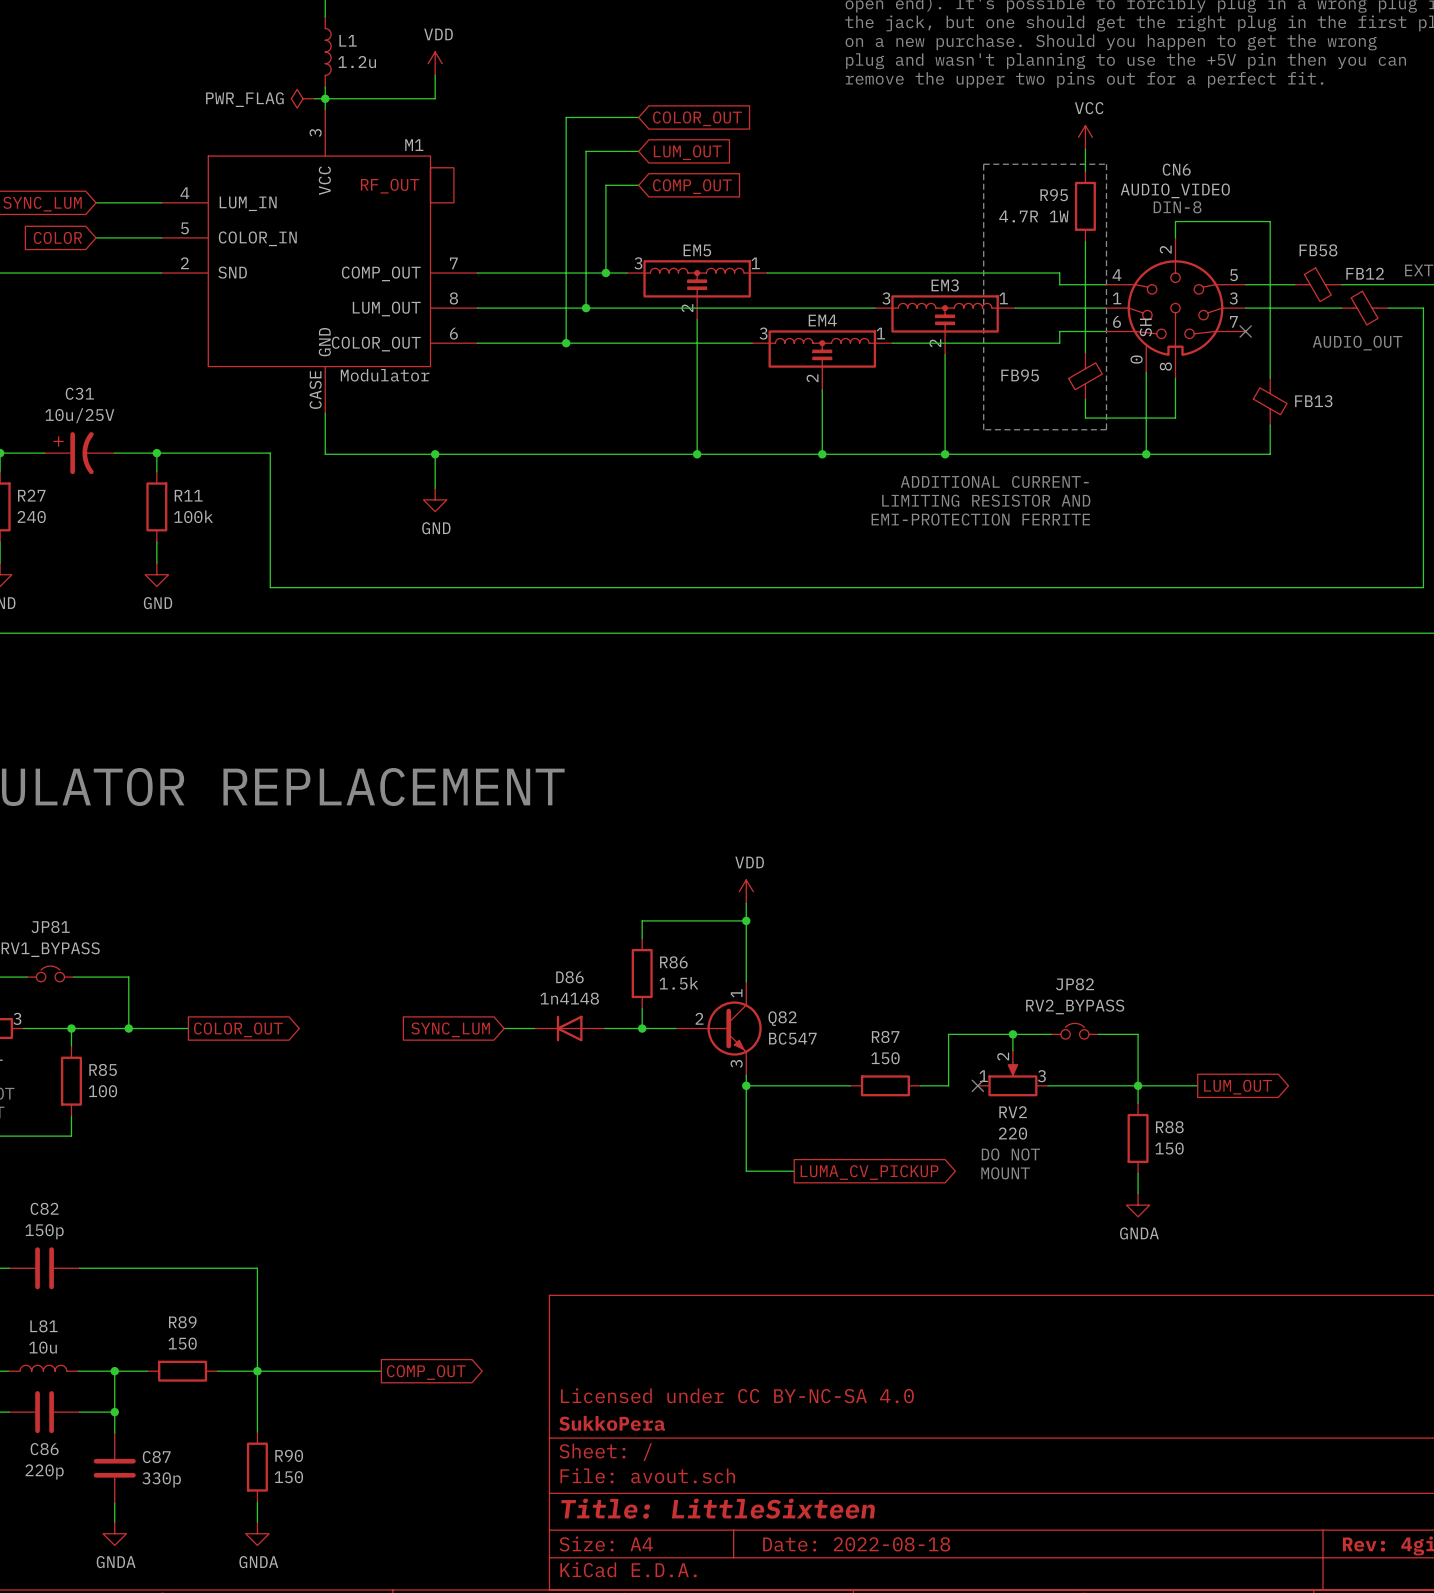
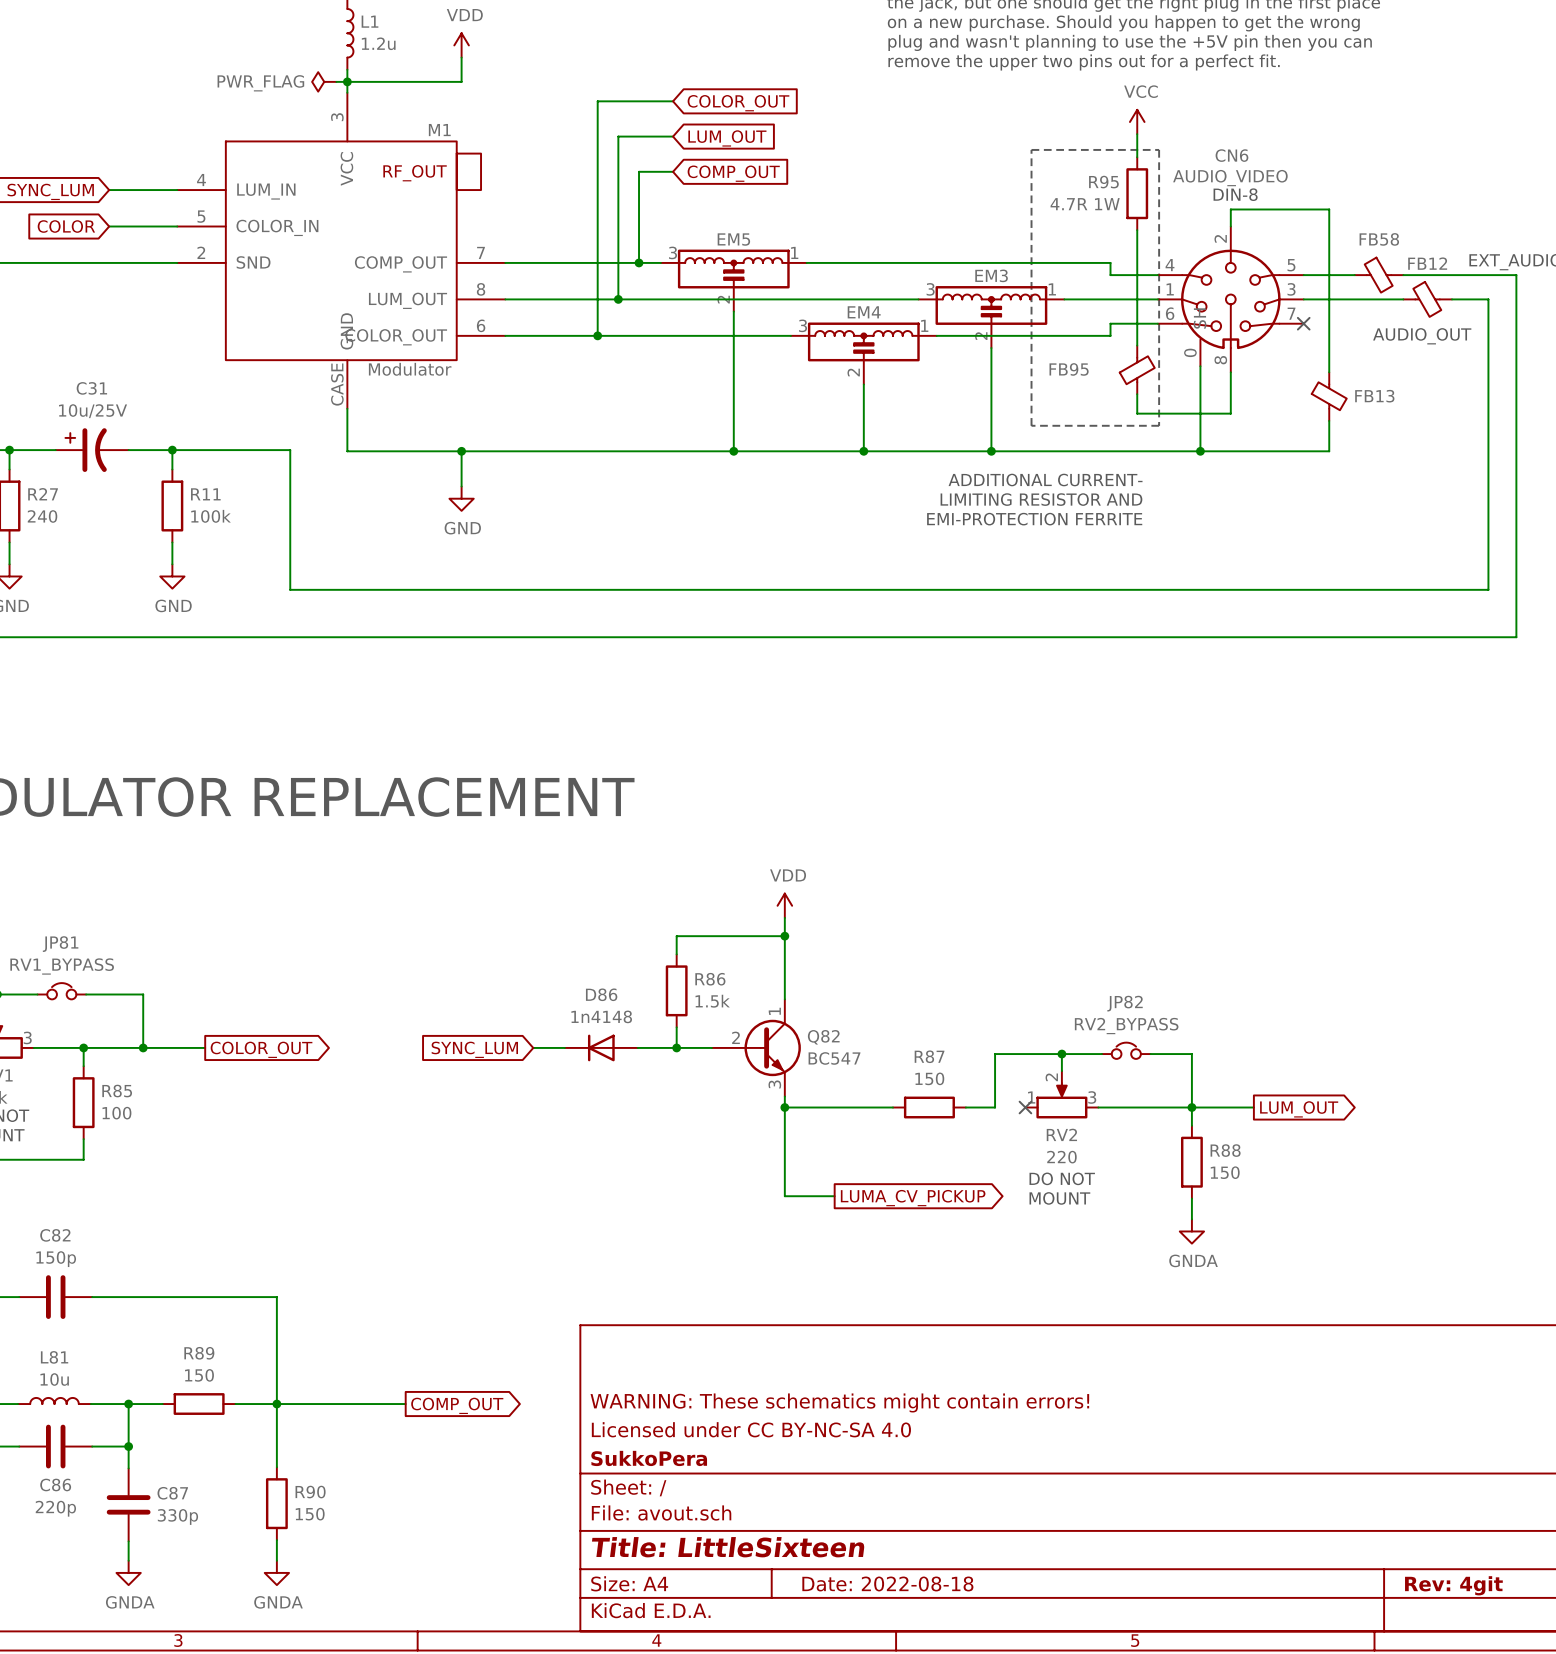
title block: none -> WARNING: These schematics might contain errors! (839, 1402)

